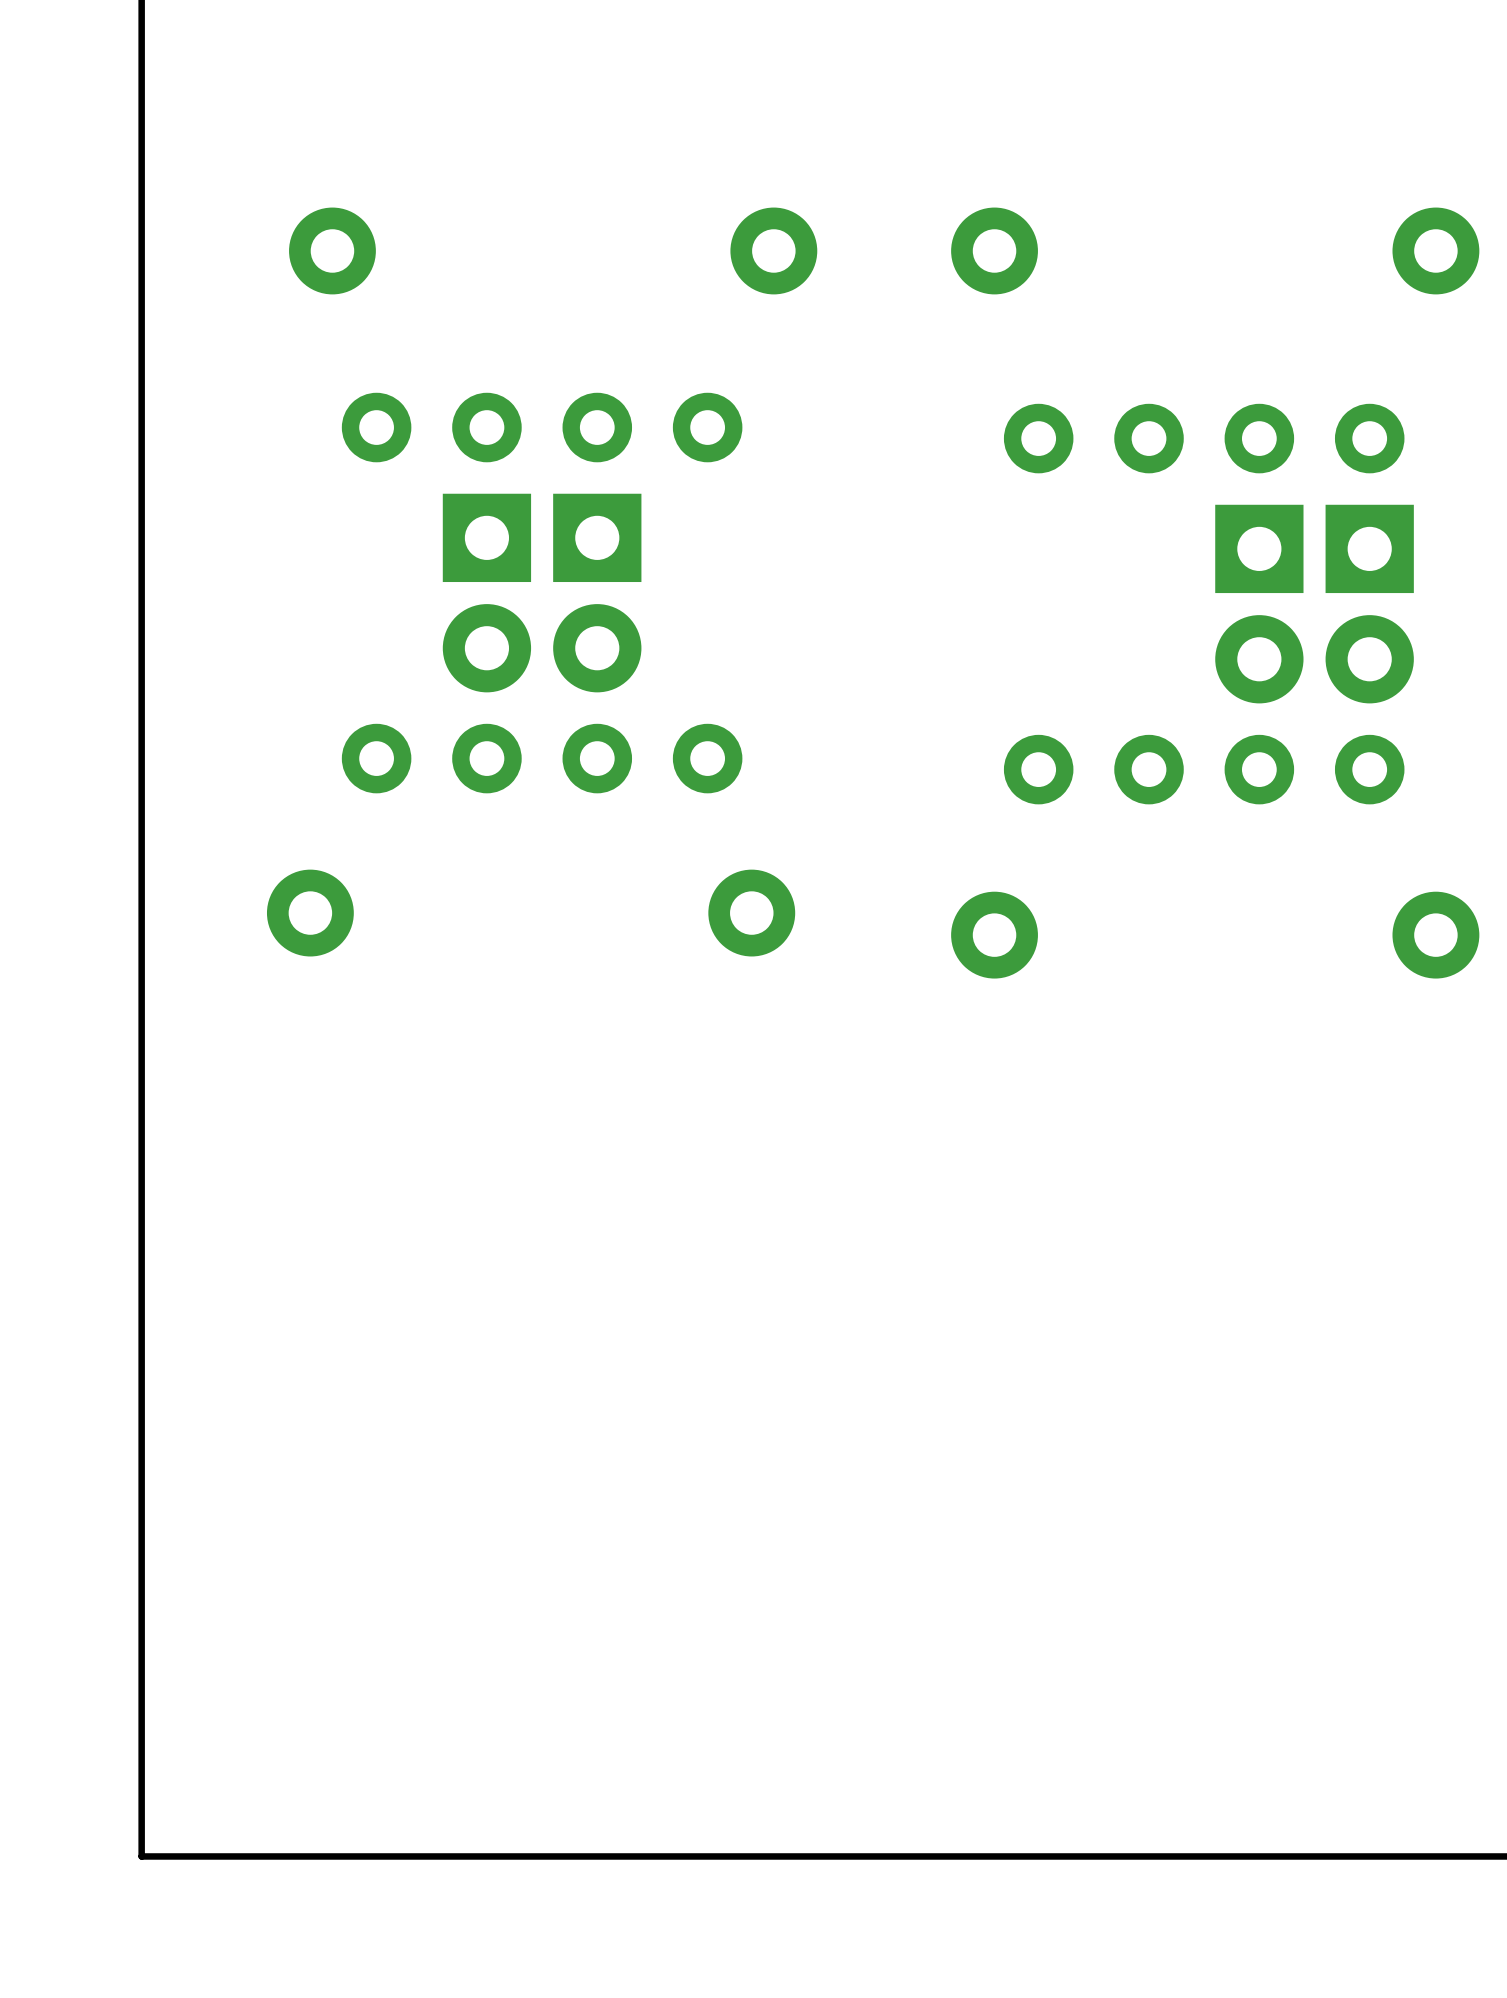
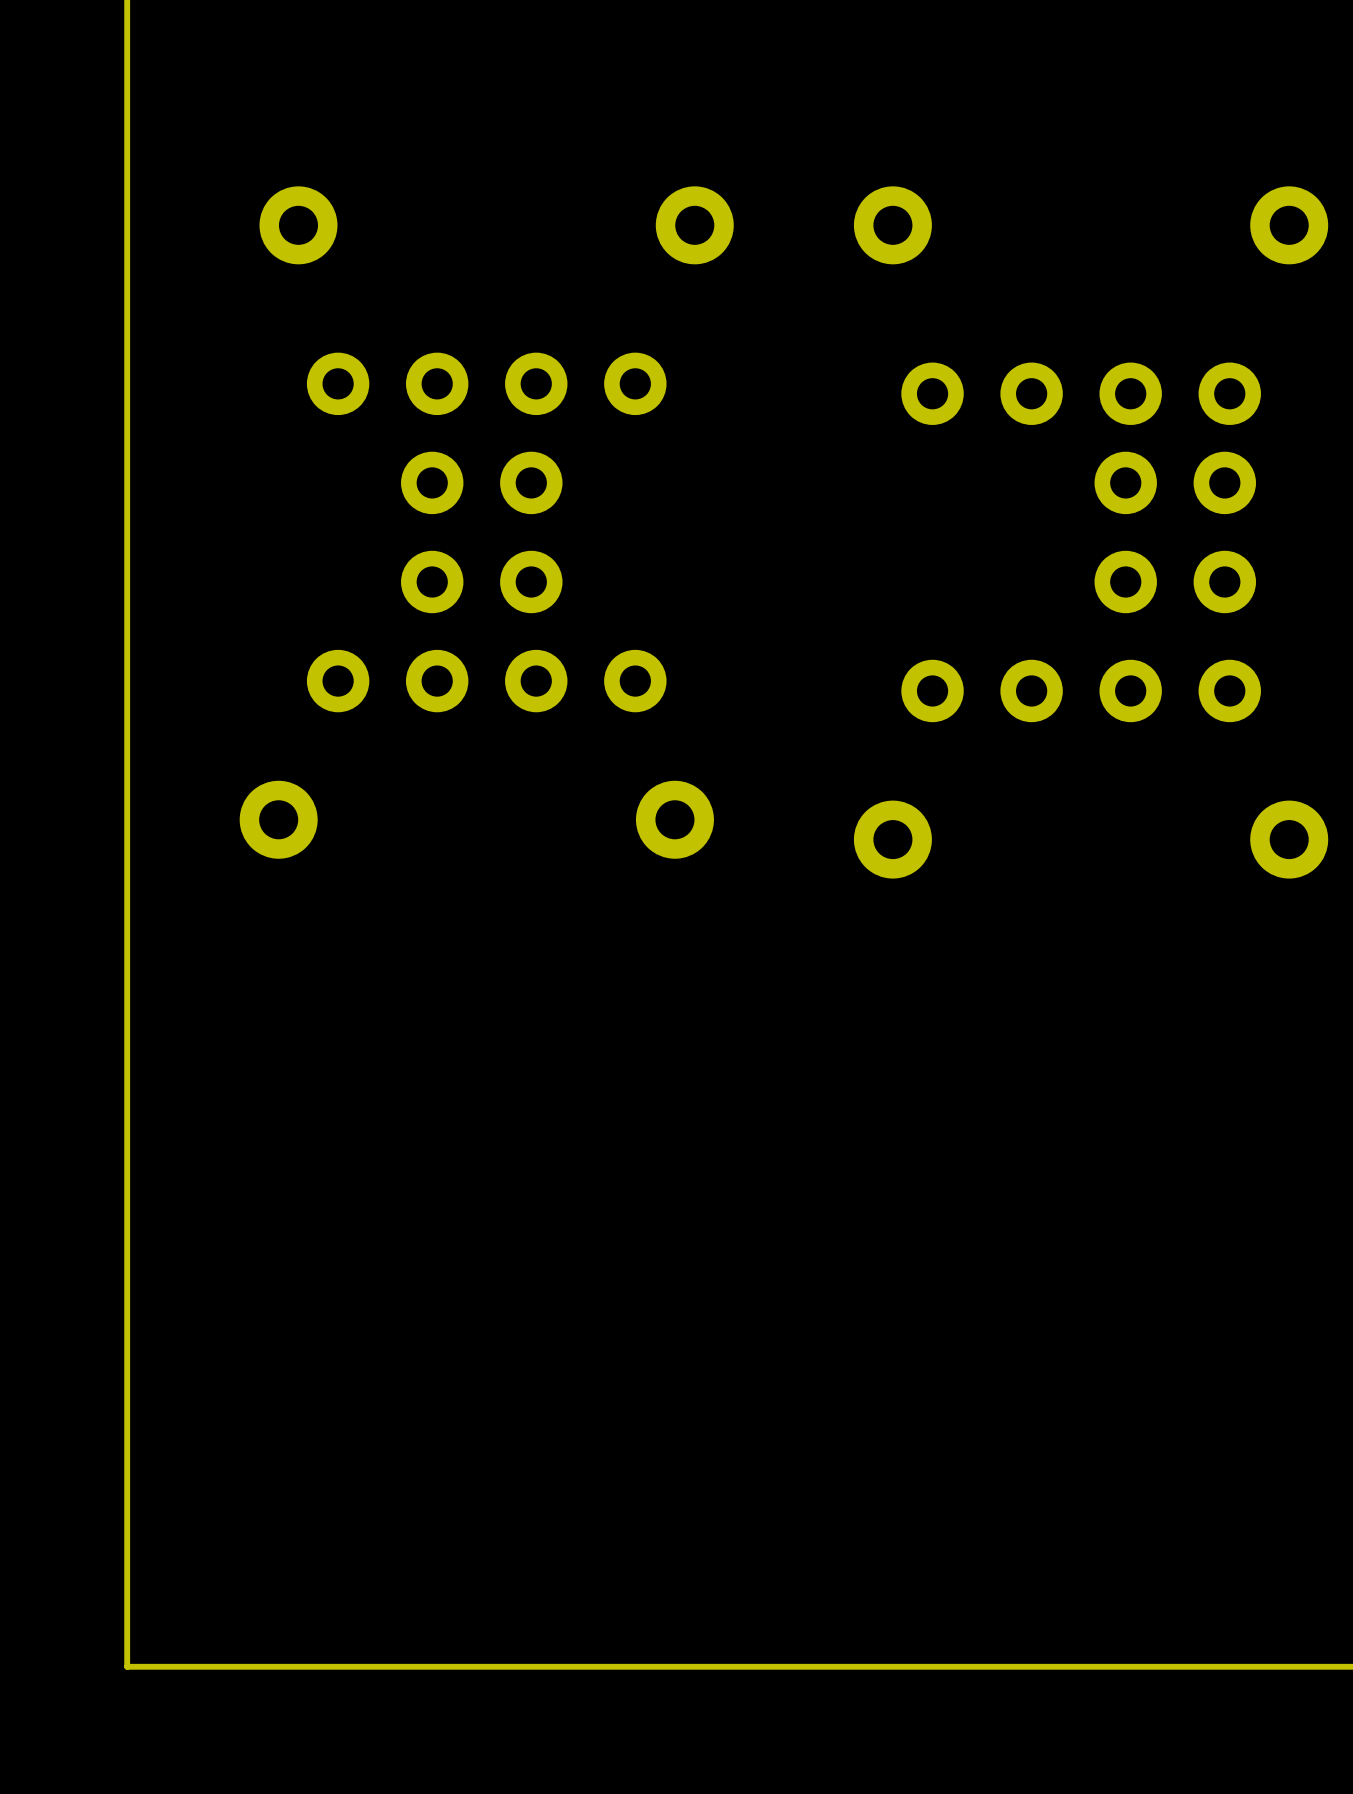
part footprint: [442, 493, 532, 693] -> [401, 451, 464, 614]
part footprint: [553, 493, 642, 693] -> [500, 451, 563, 614]
part footprint: [1215, 504, 1304, 704] -> [1094, 451, 1157, 614]
part footprint: [1325, 504, 1414, 704] -> [1193, 451, 1257, 614]

